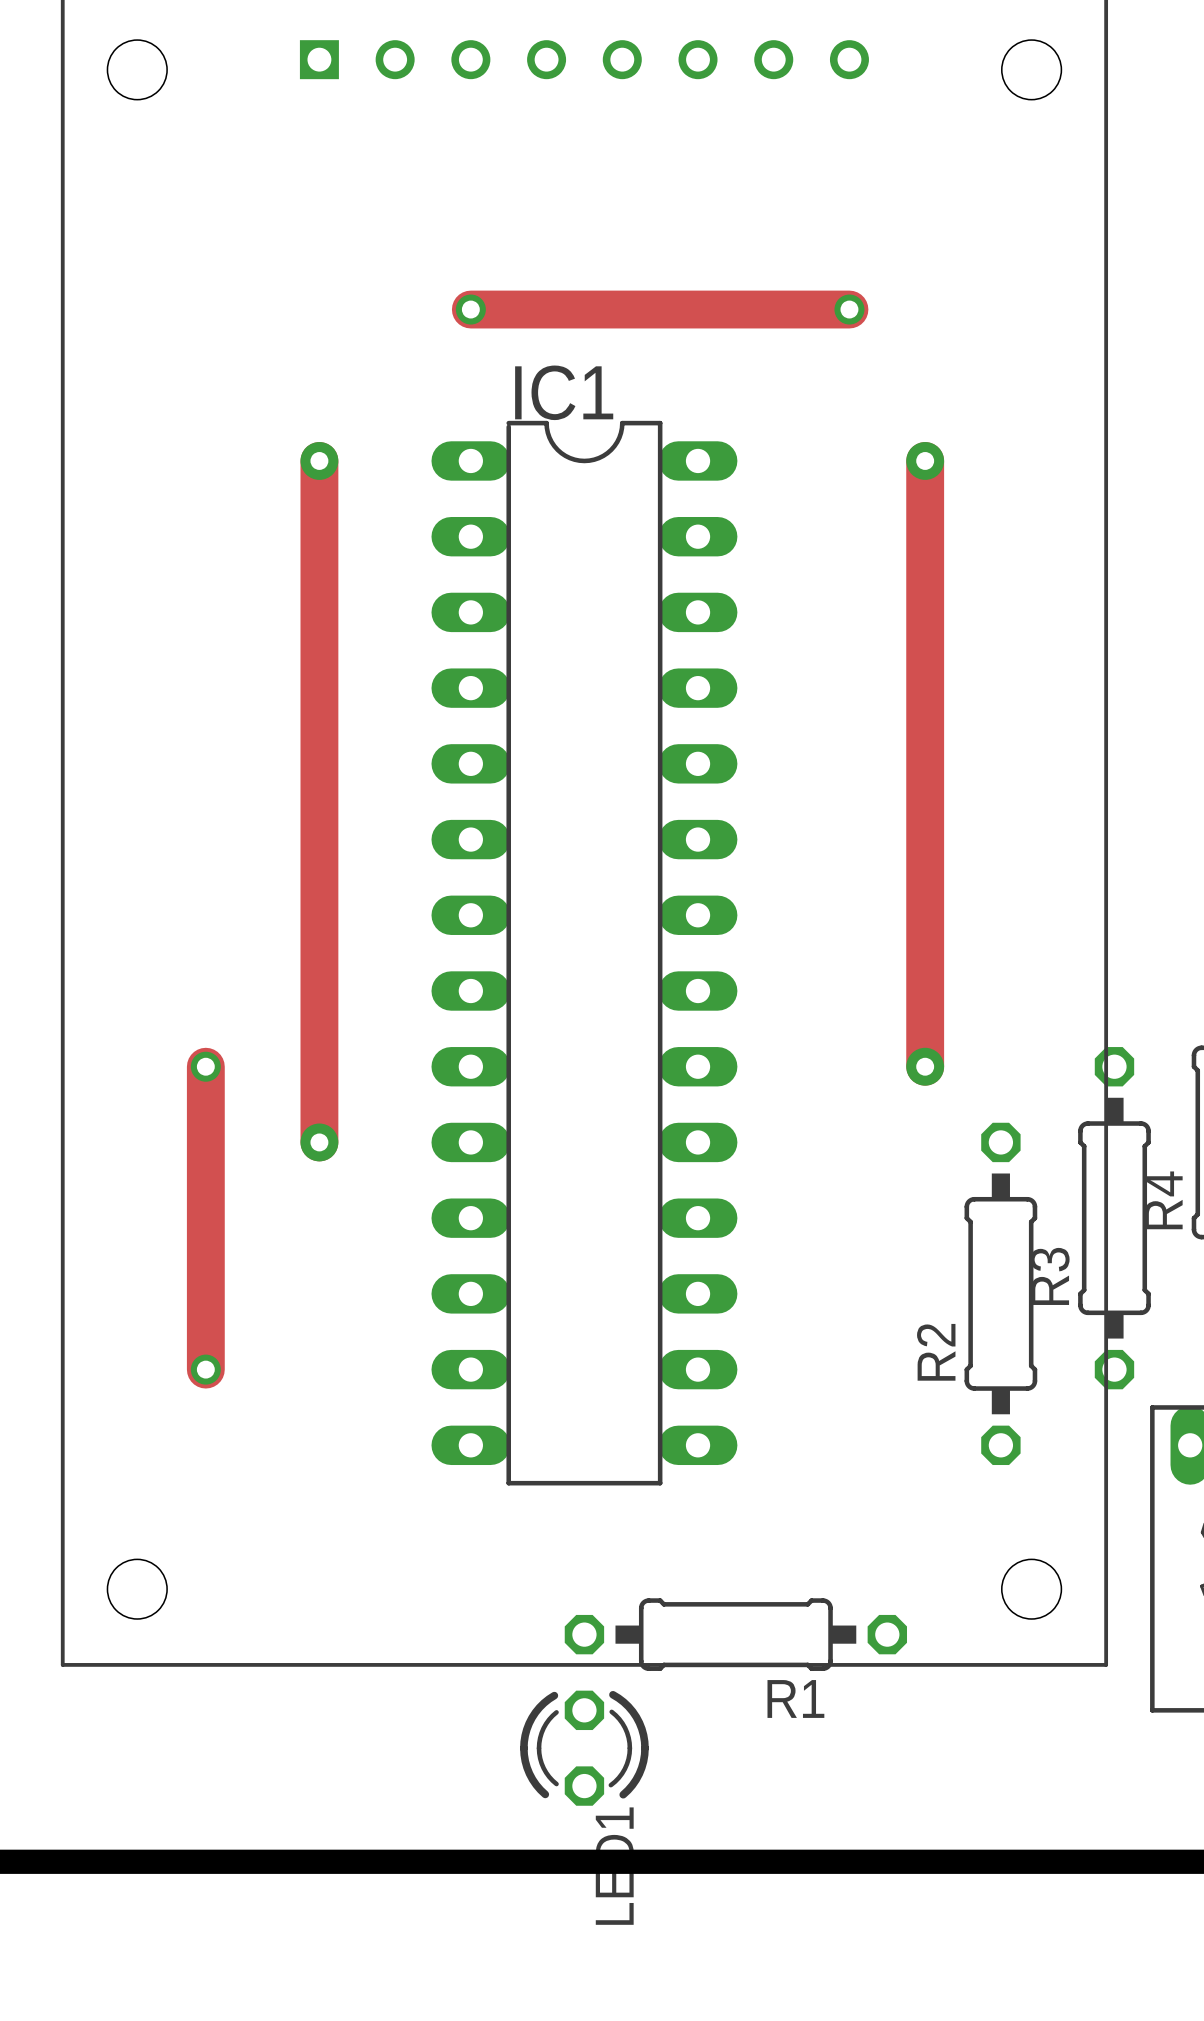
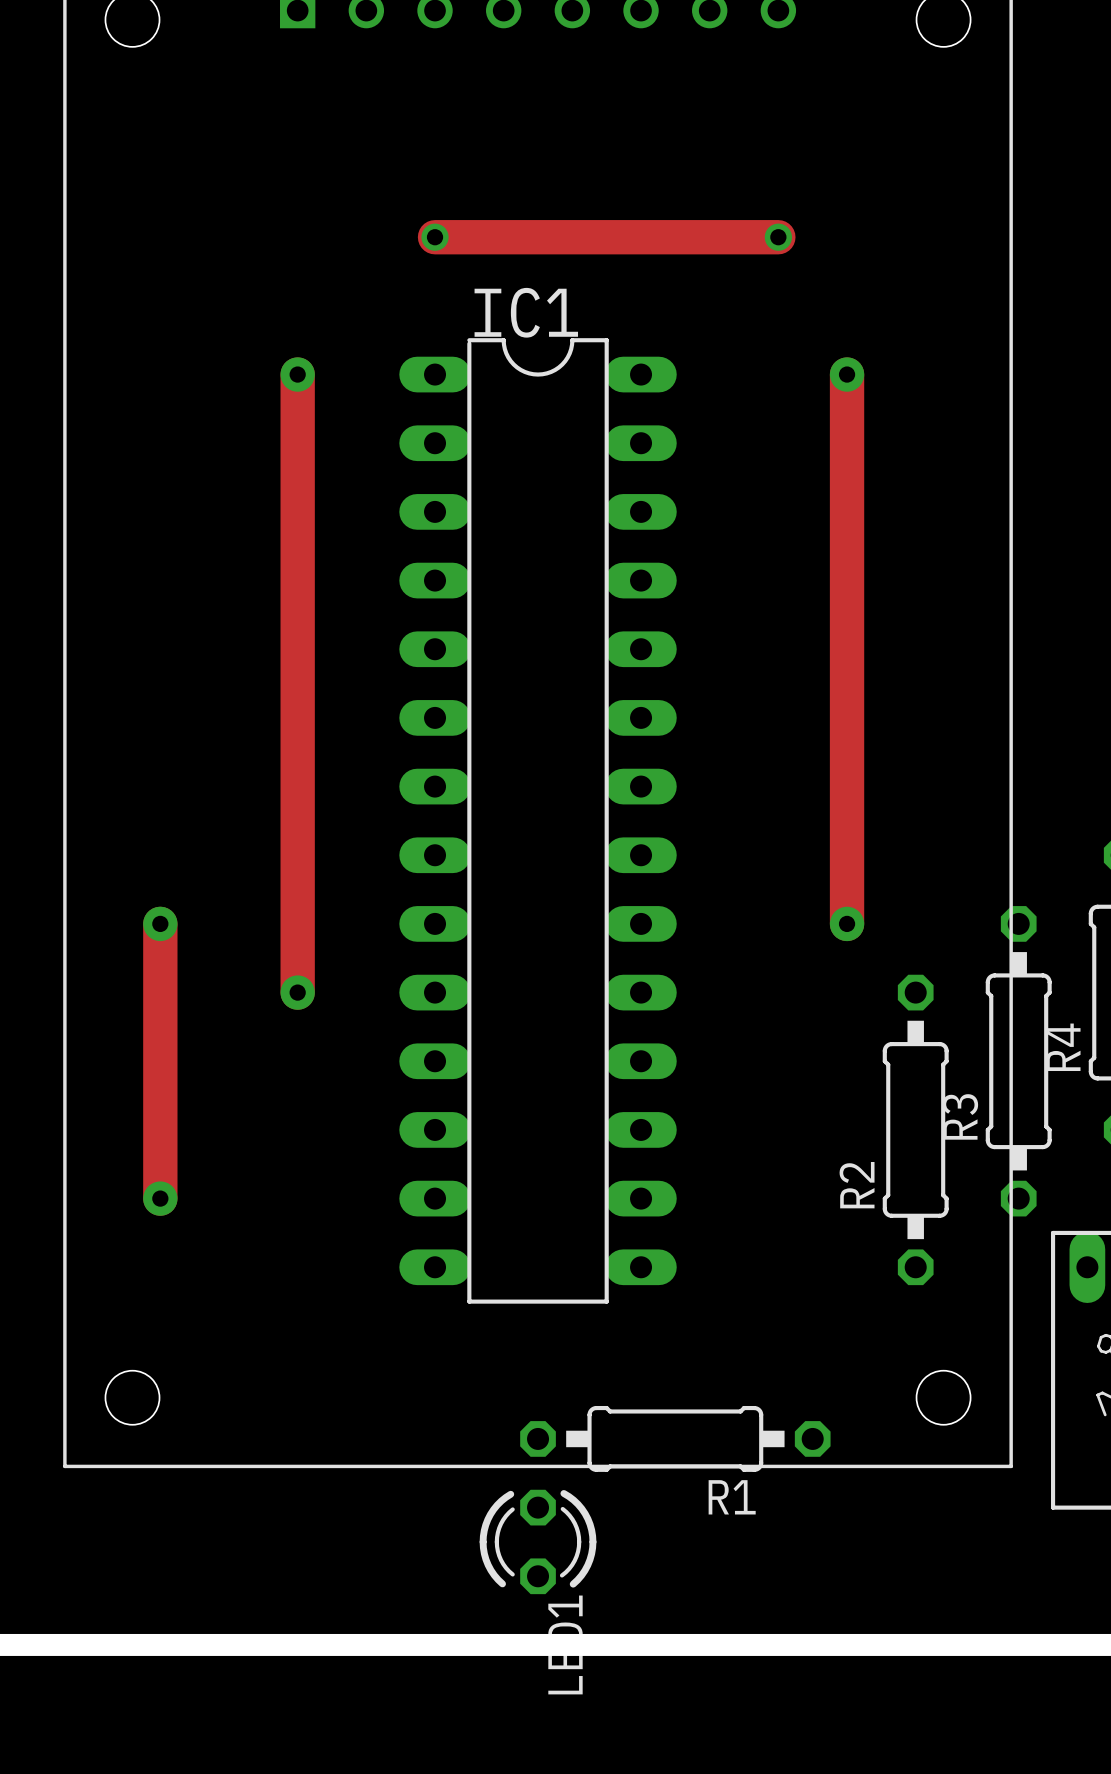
via: none -> (160, 923)
track: (205, 1066) (205, 1369) -> (160, 923) (160, 1198)
via: (205, 1066) -> none
via: none -> (160, 1198)
via: (205, 1369) -> none

